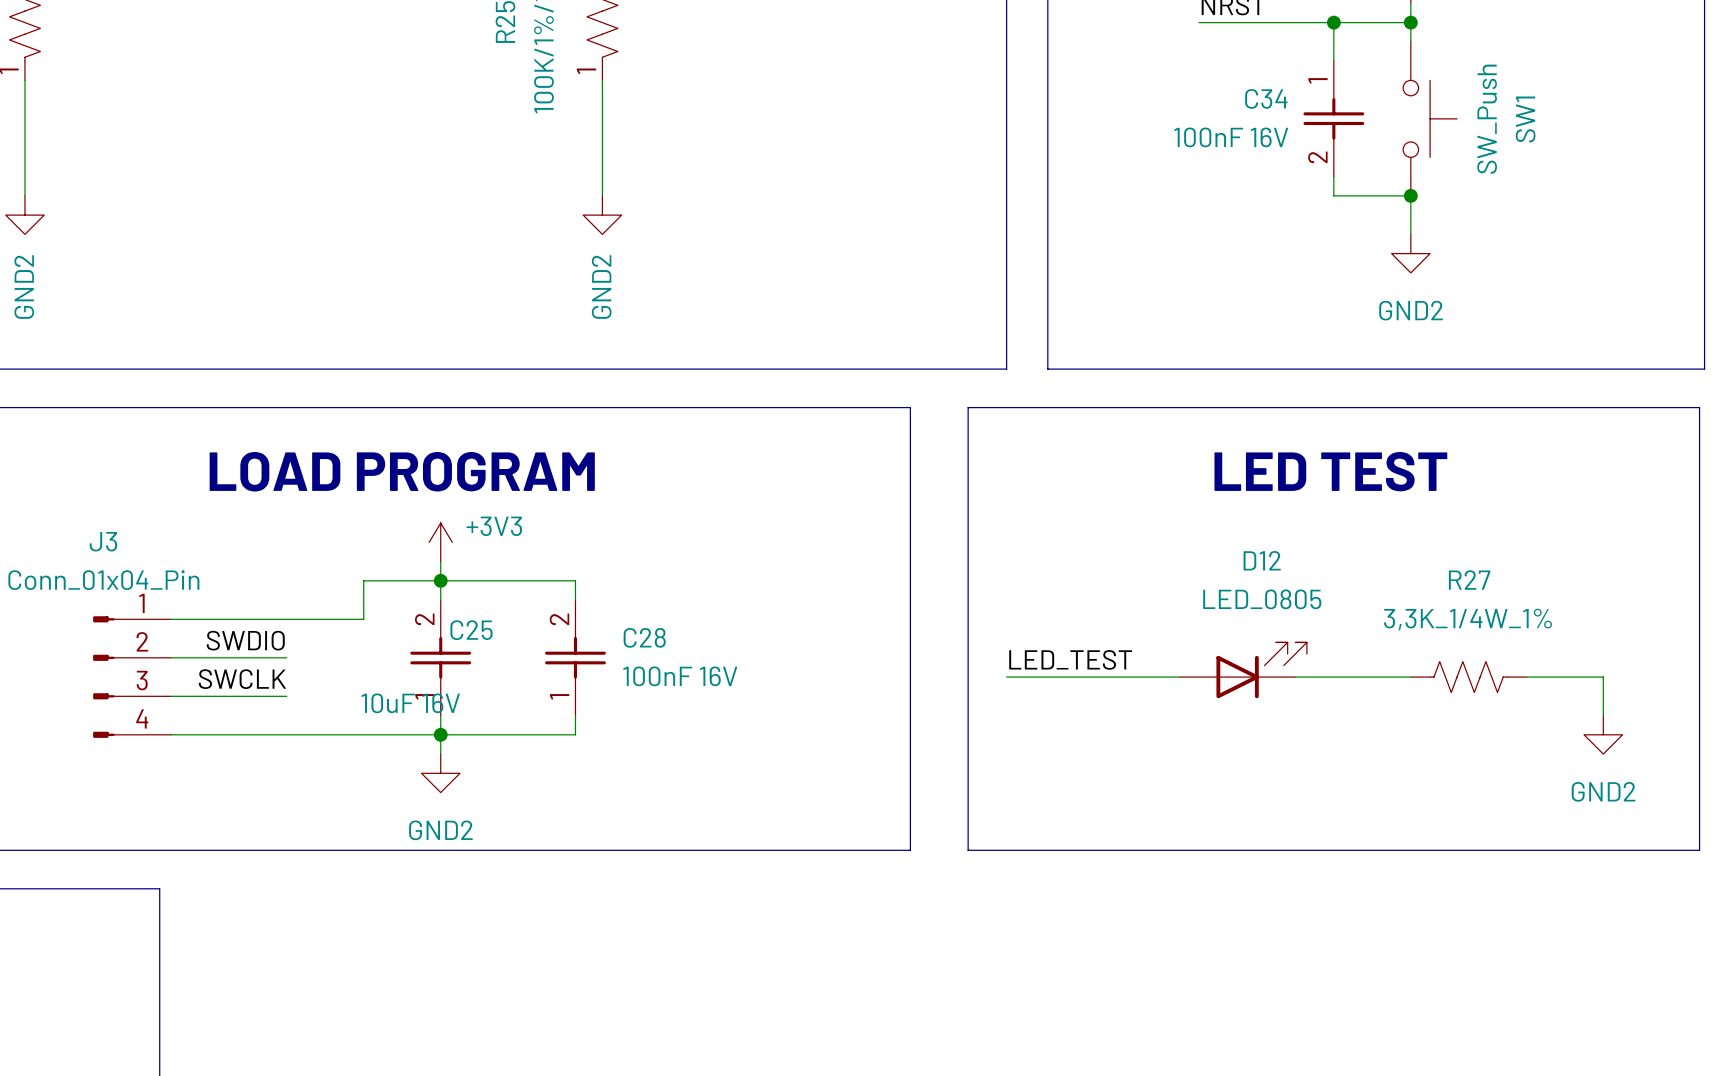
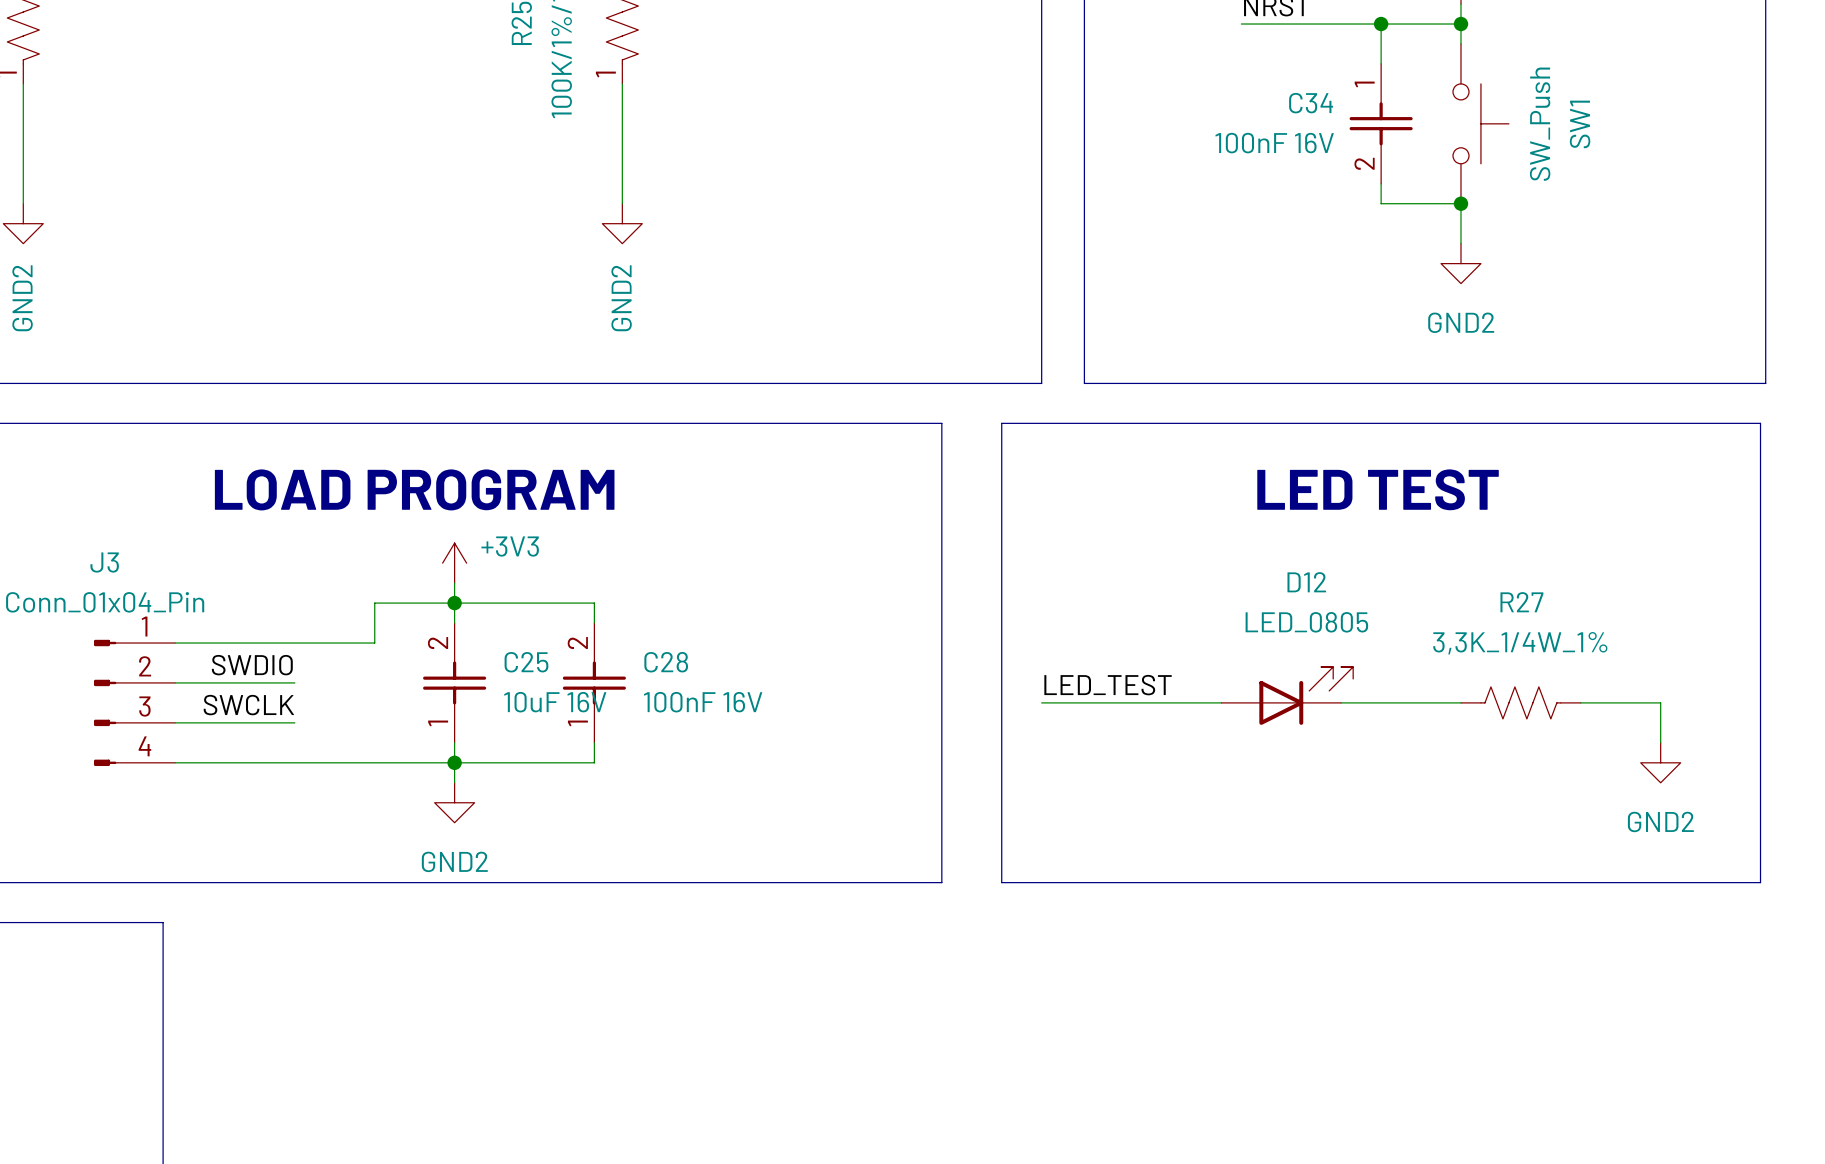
C25 name position: C25 (471, 630) -> C25 (526, 662)
C25 value position: 10uF 16V (410, 703) -> 10uF 16V (555, 702)

